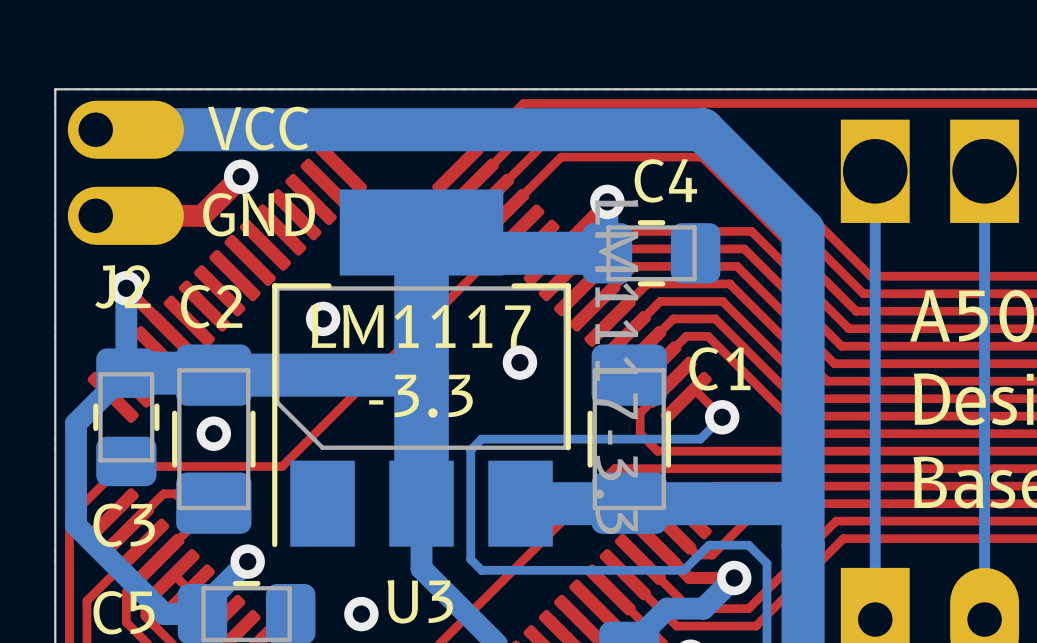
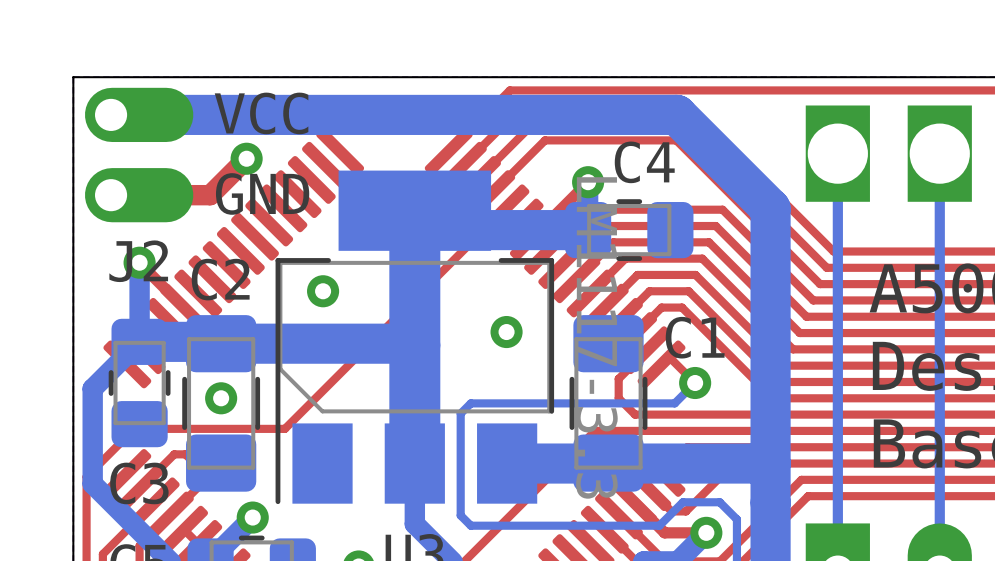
text: LM1117 (420, 326) -> none
text: -3.3 (420, 396) -> none

